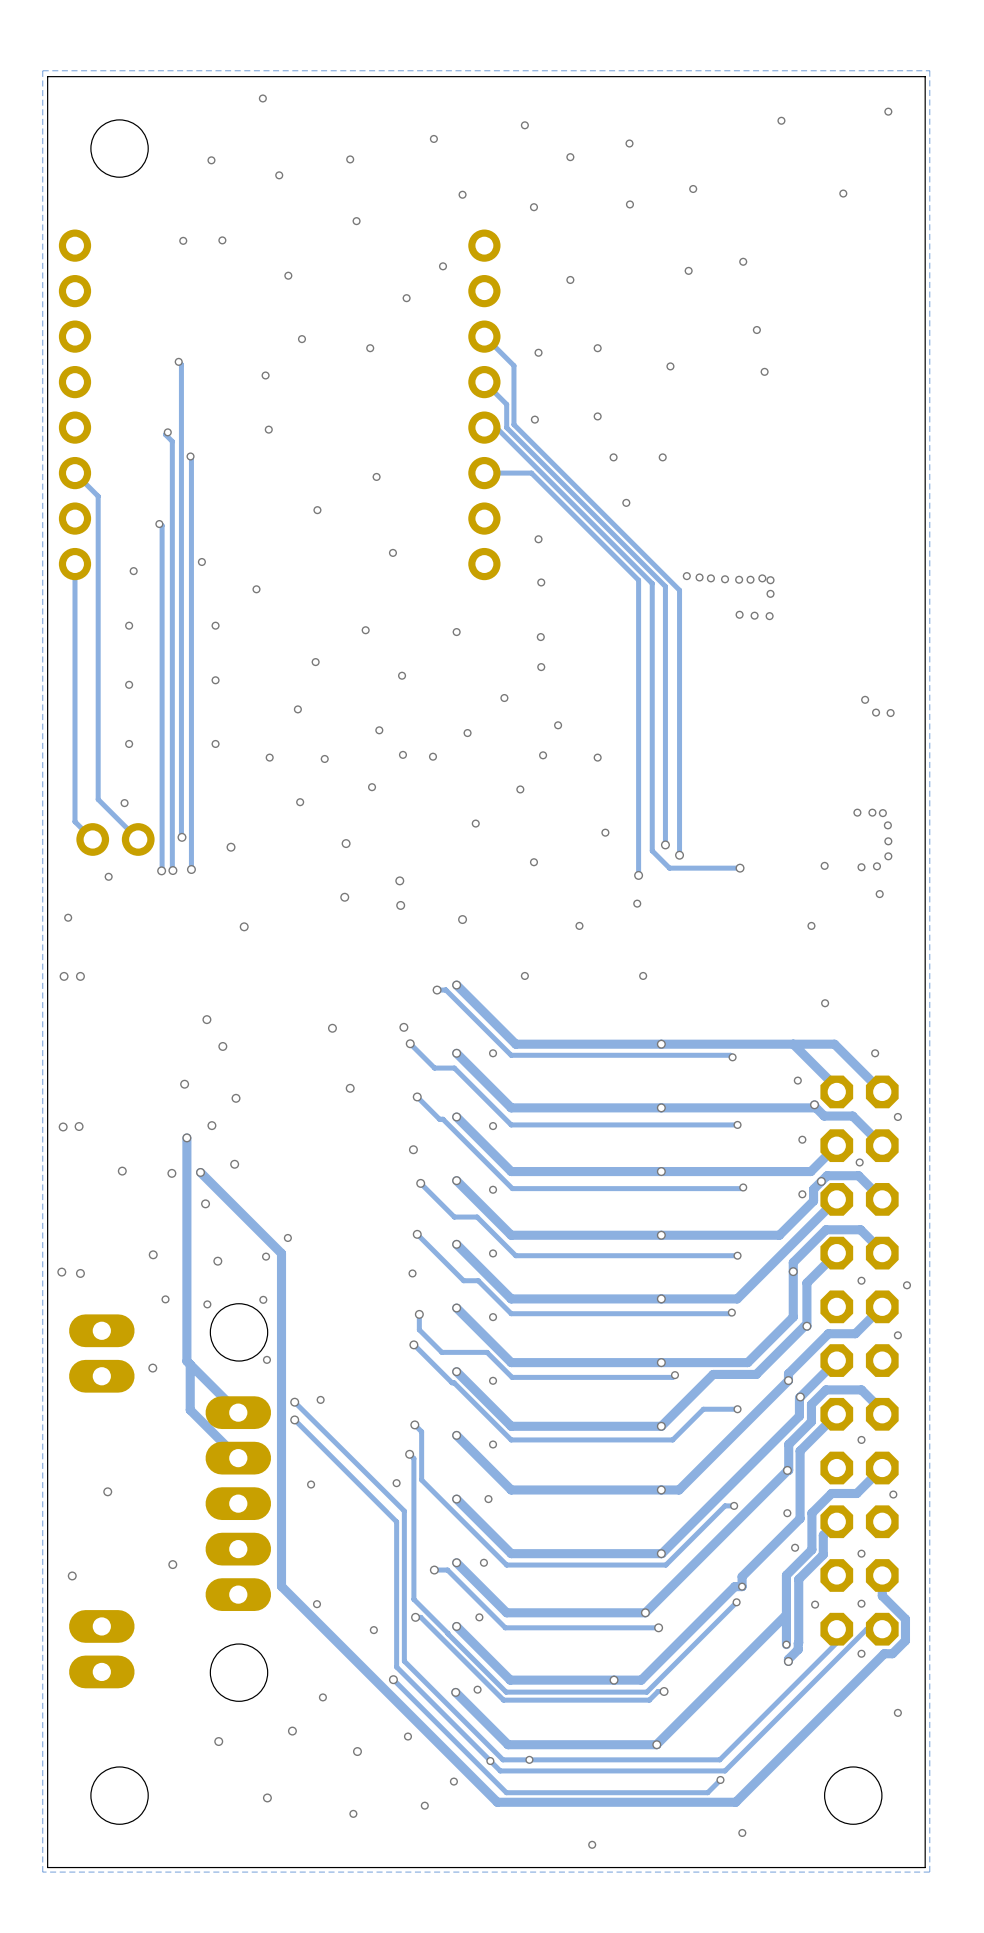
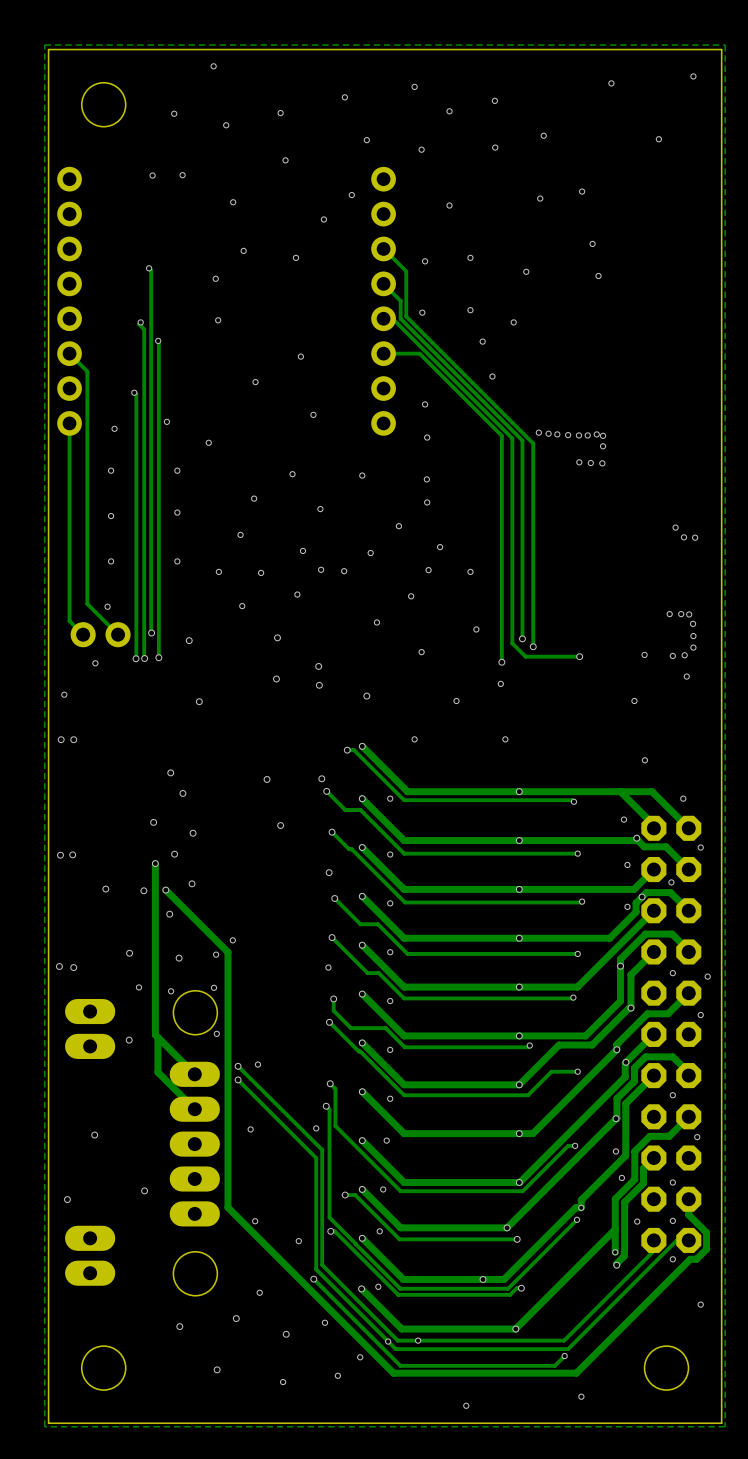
via position: (662, 457) -> (513, 322)

